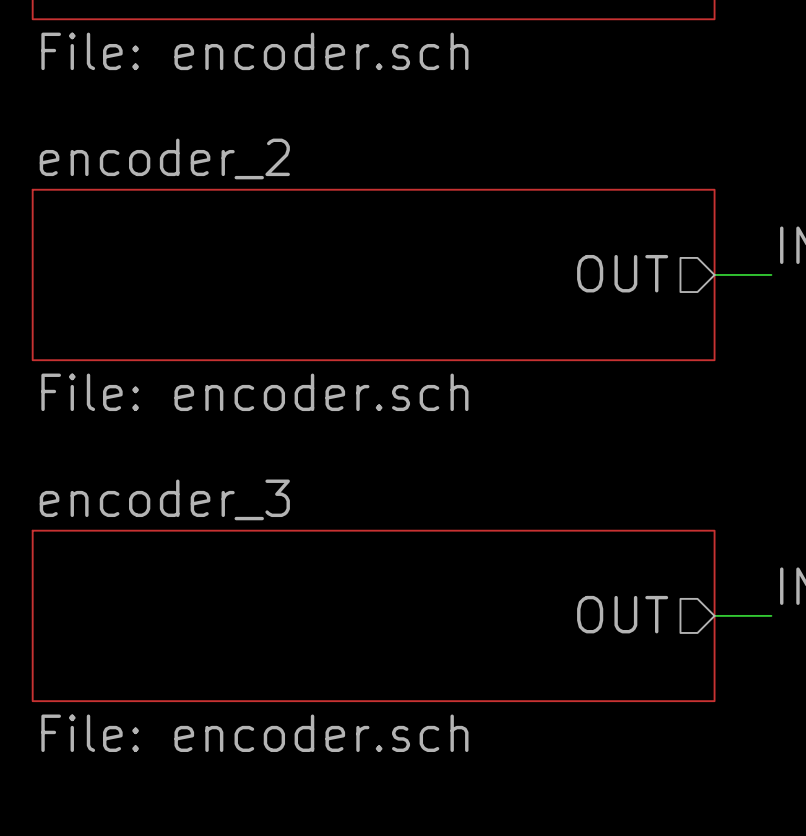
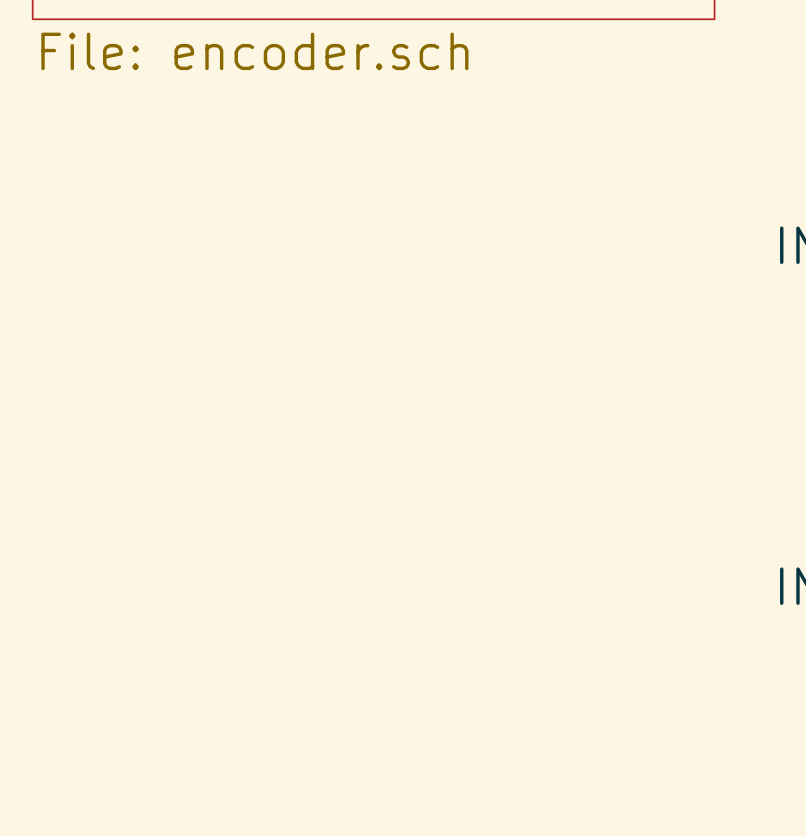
sheet pin: OUT (622, 273) -> none
sheet encoder_2: File: encoder.sch (373, 274) -> none
wire: (714, 274) (771, 274) -> none
sheet pin: OUT (622, 614) -> none
sheet encoder_3: File: encoder.sch (373, 615) -> none
wire: (714, 615) (771, 615) -> none

